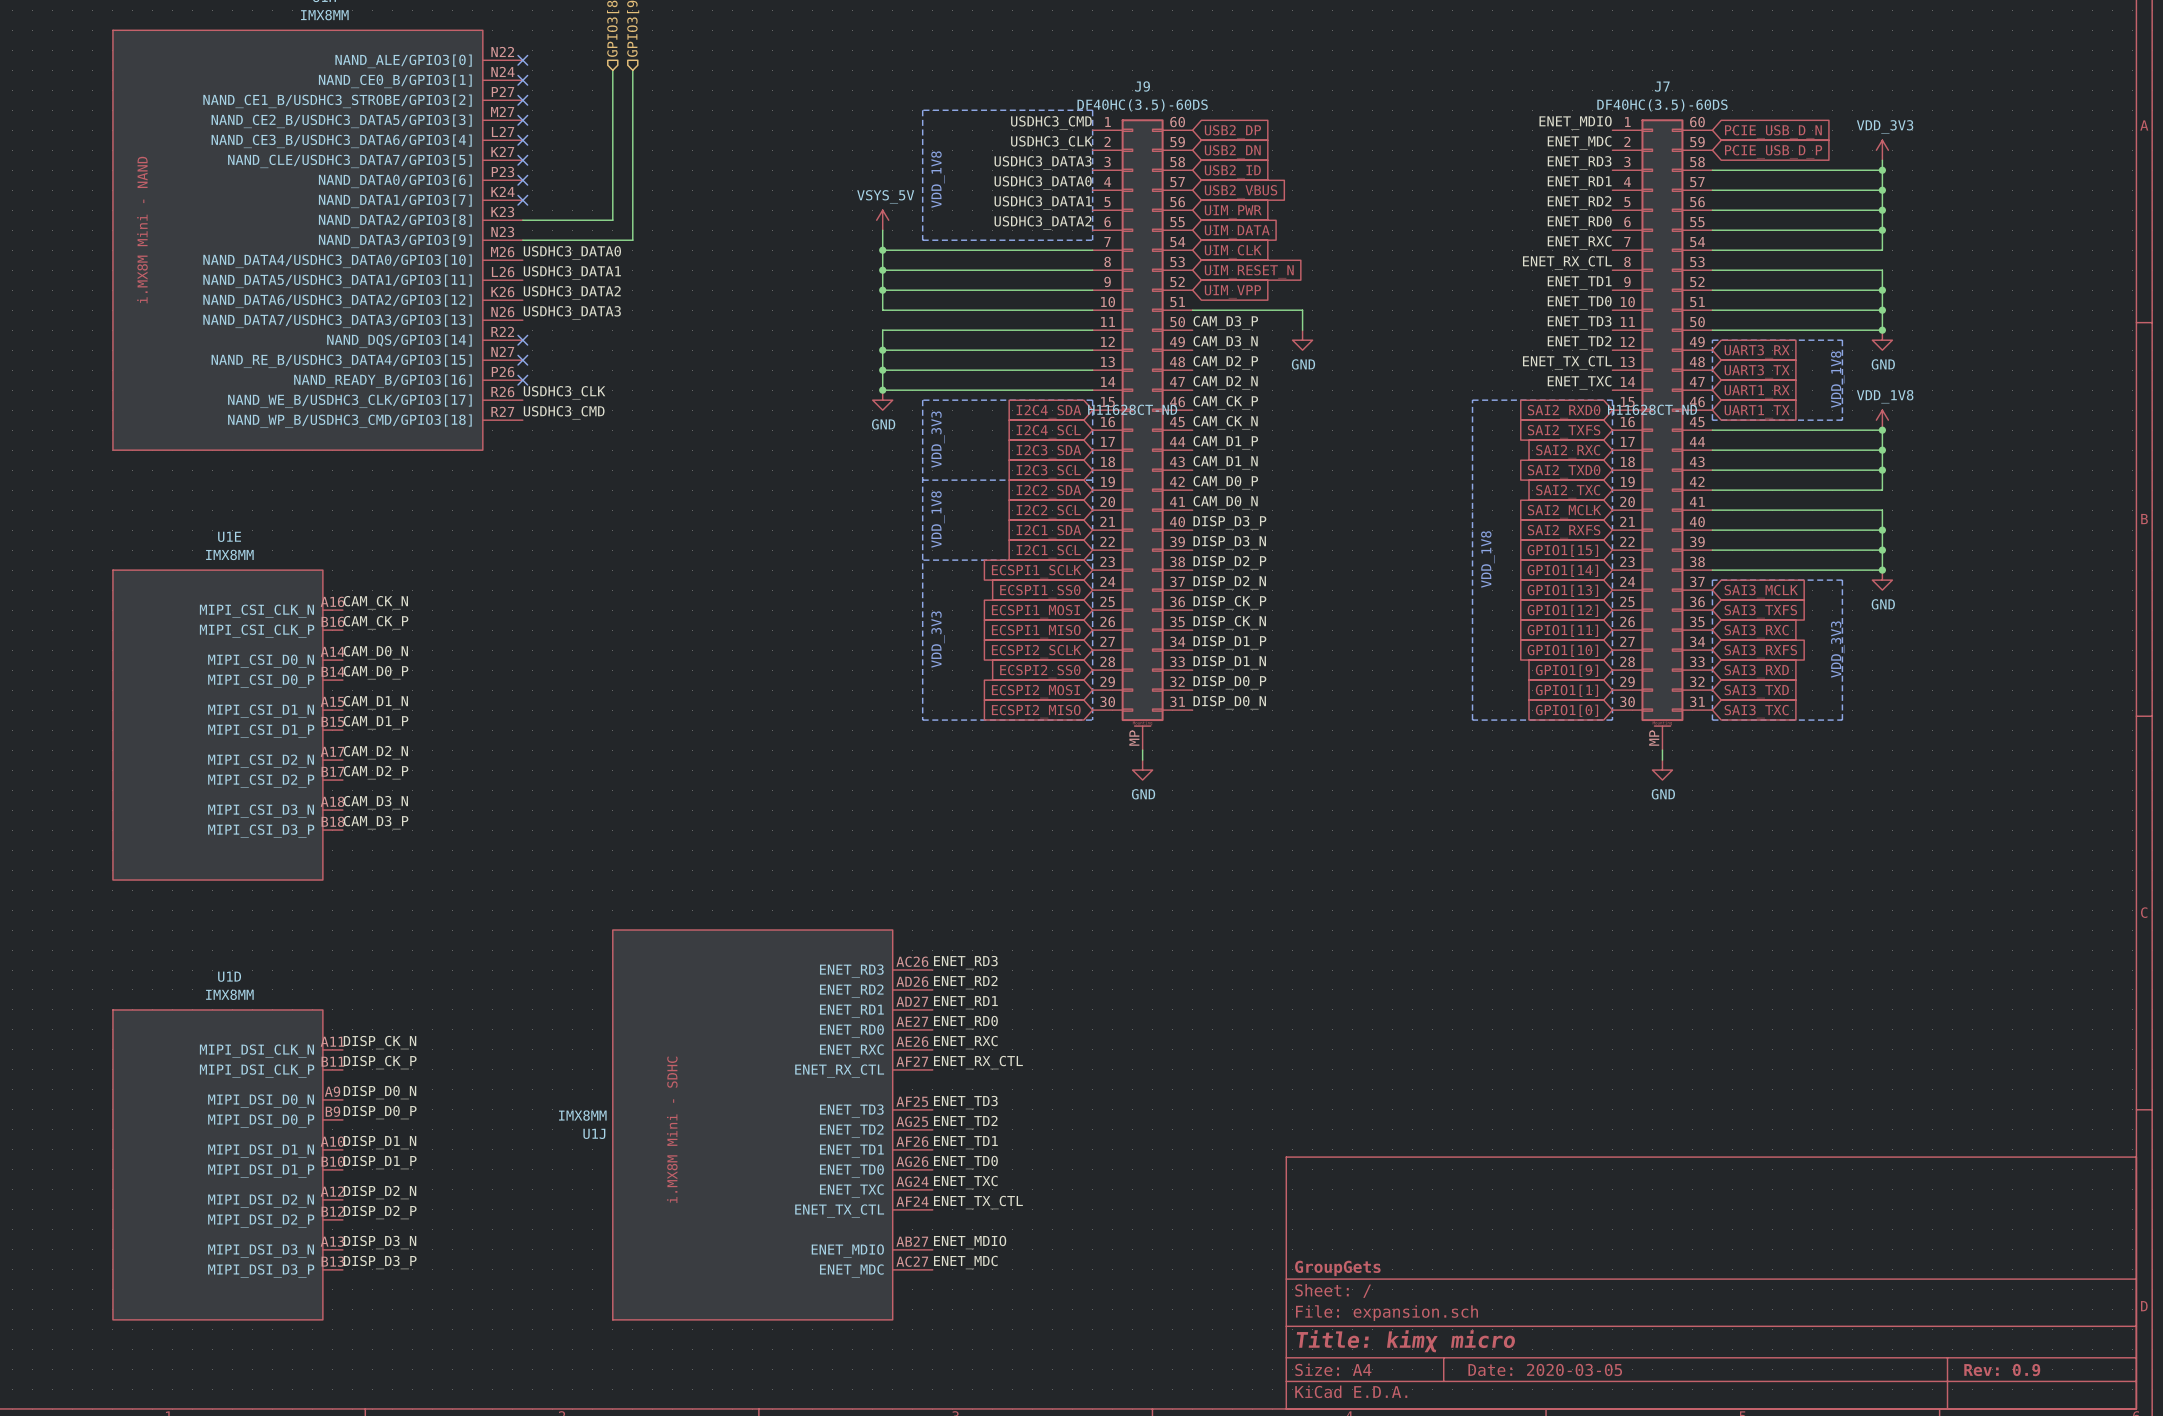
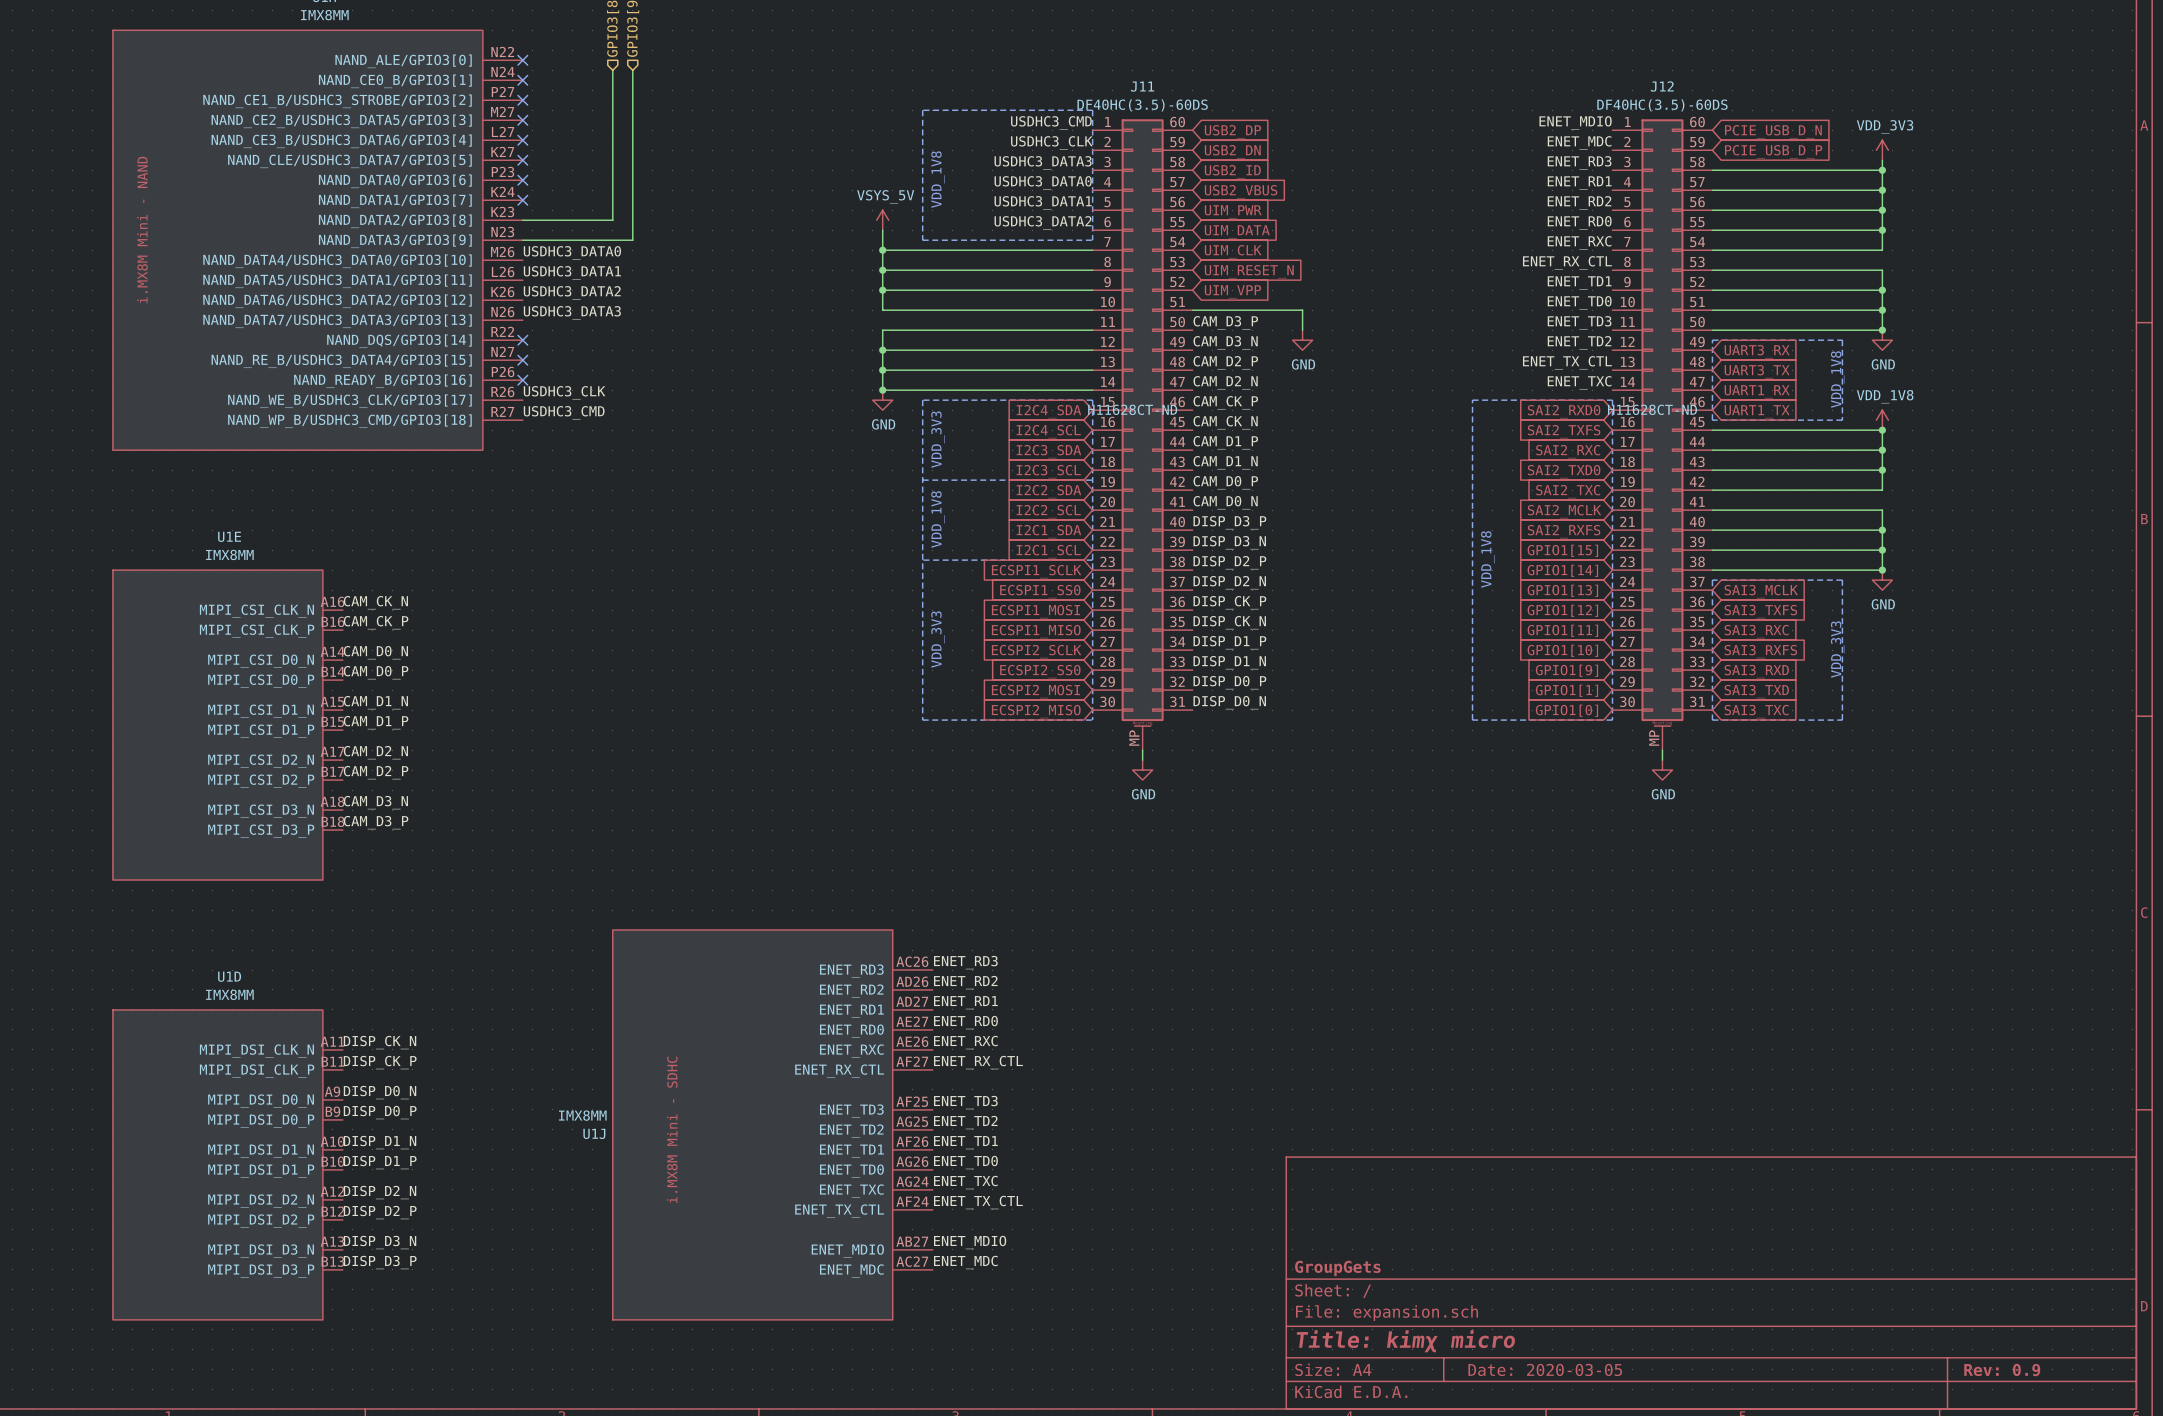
J9 name: J9 (1142, 86) -> J11 (1142, 86)
J7 name: J7 (1662, 86) -> J12 (1662, 86)

